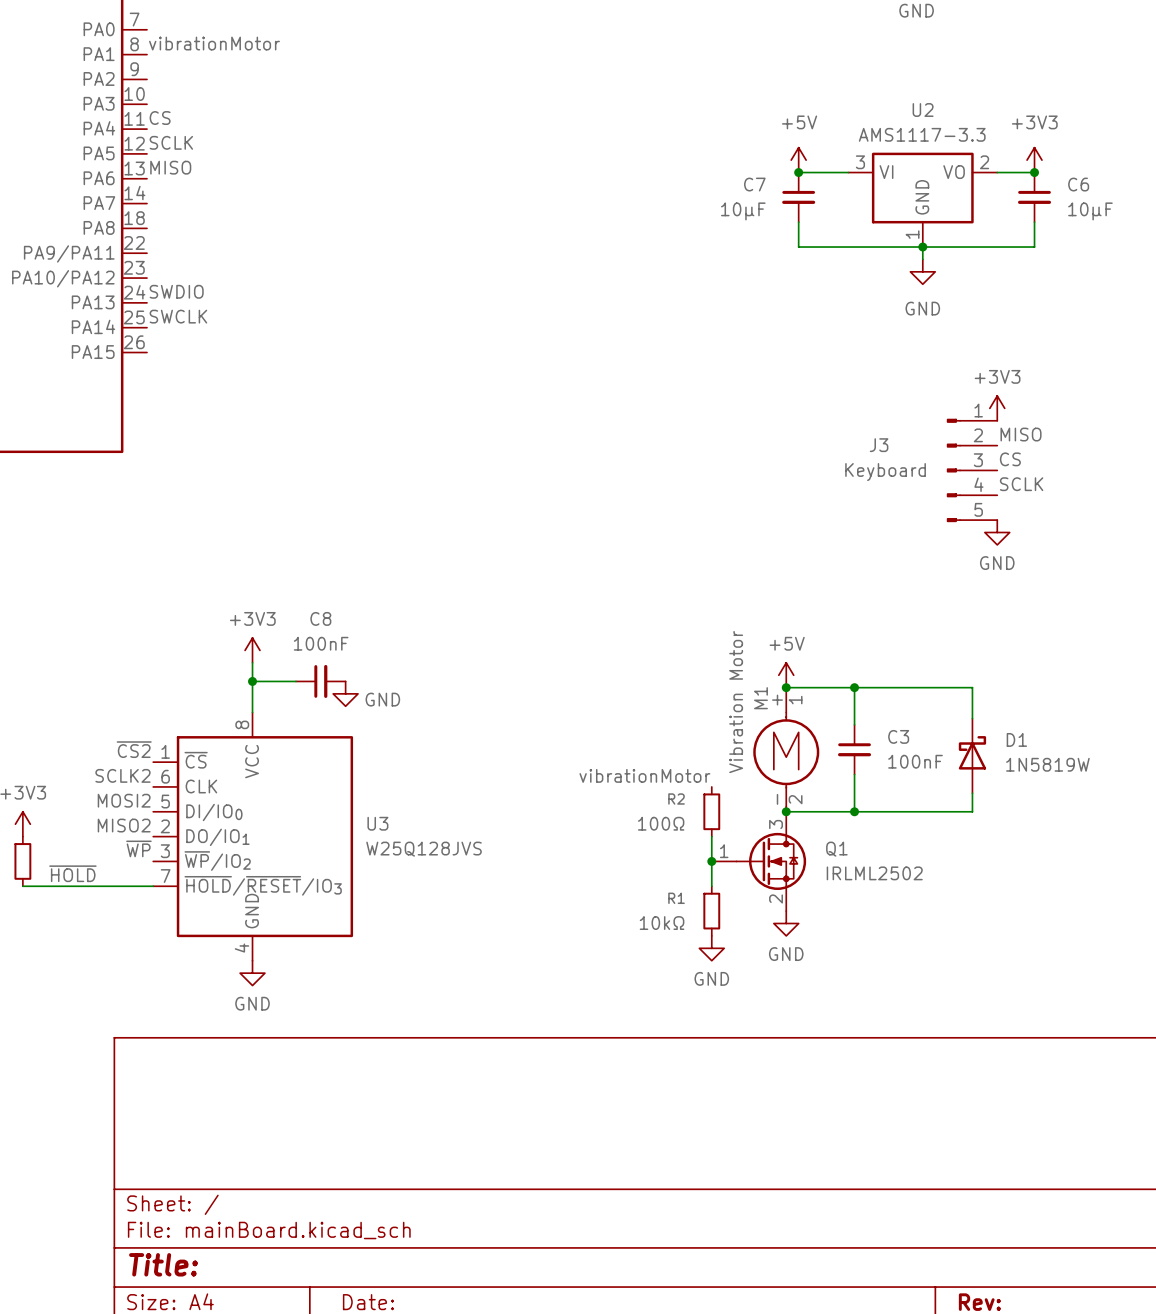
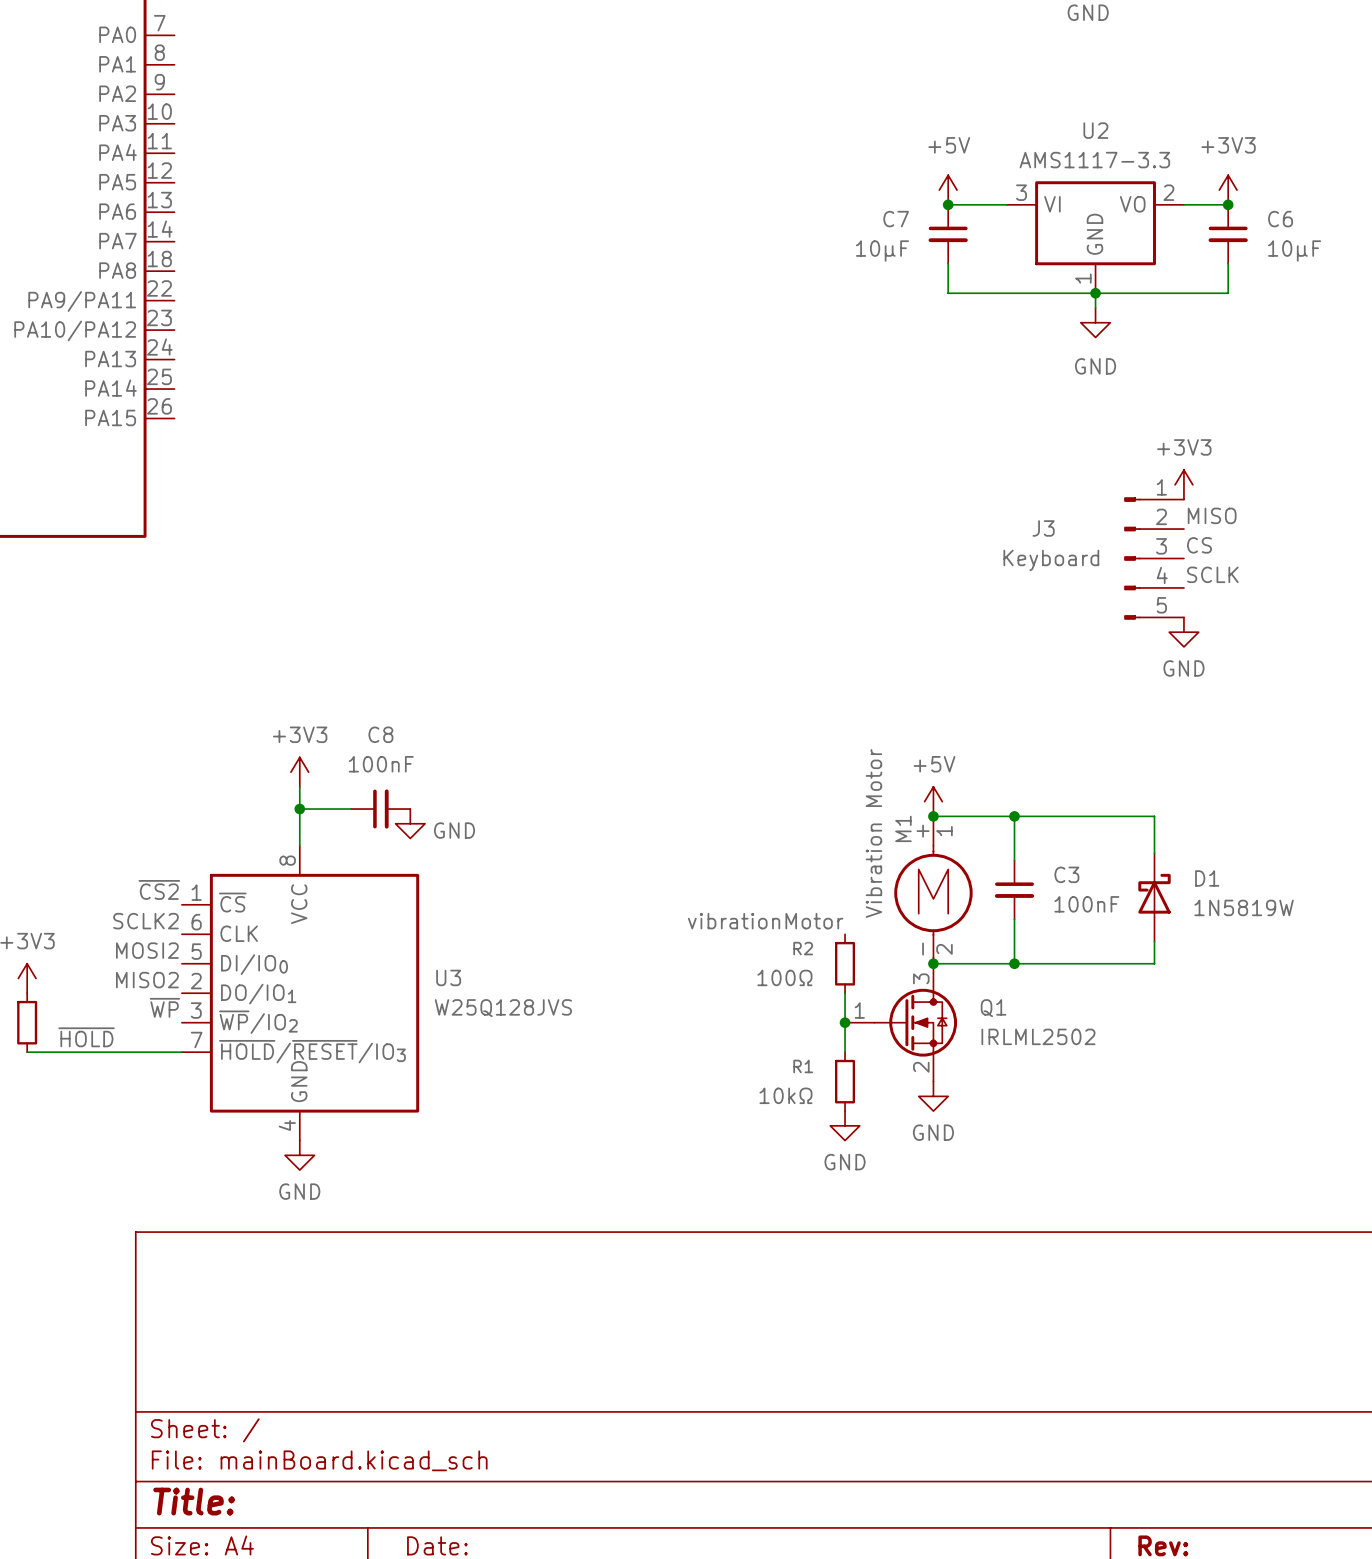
label: vibrationMotor (214, 43) -> none
label: CS (160, 118) -> none
label: SCLK (171, 142) -> none
label: MISO (170, 167) -> none
label: SWDIO (176, 291) -> none
label: SWCLK (178, 316) -> none

